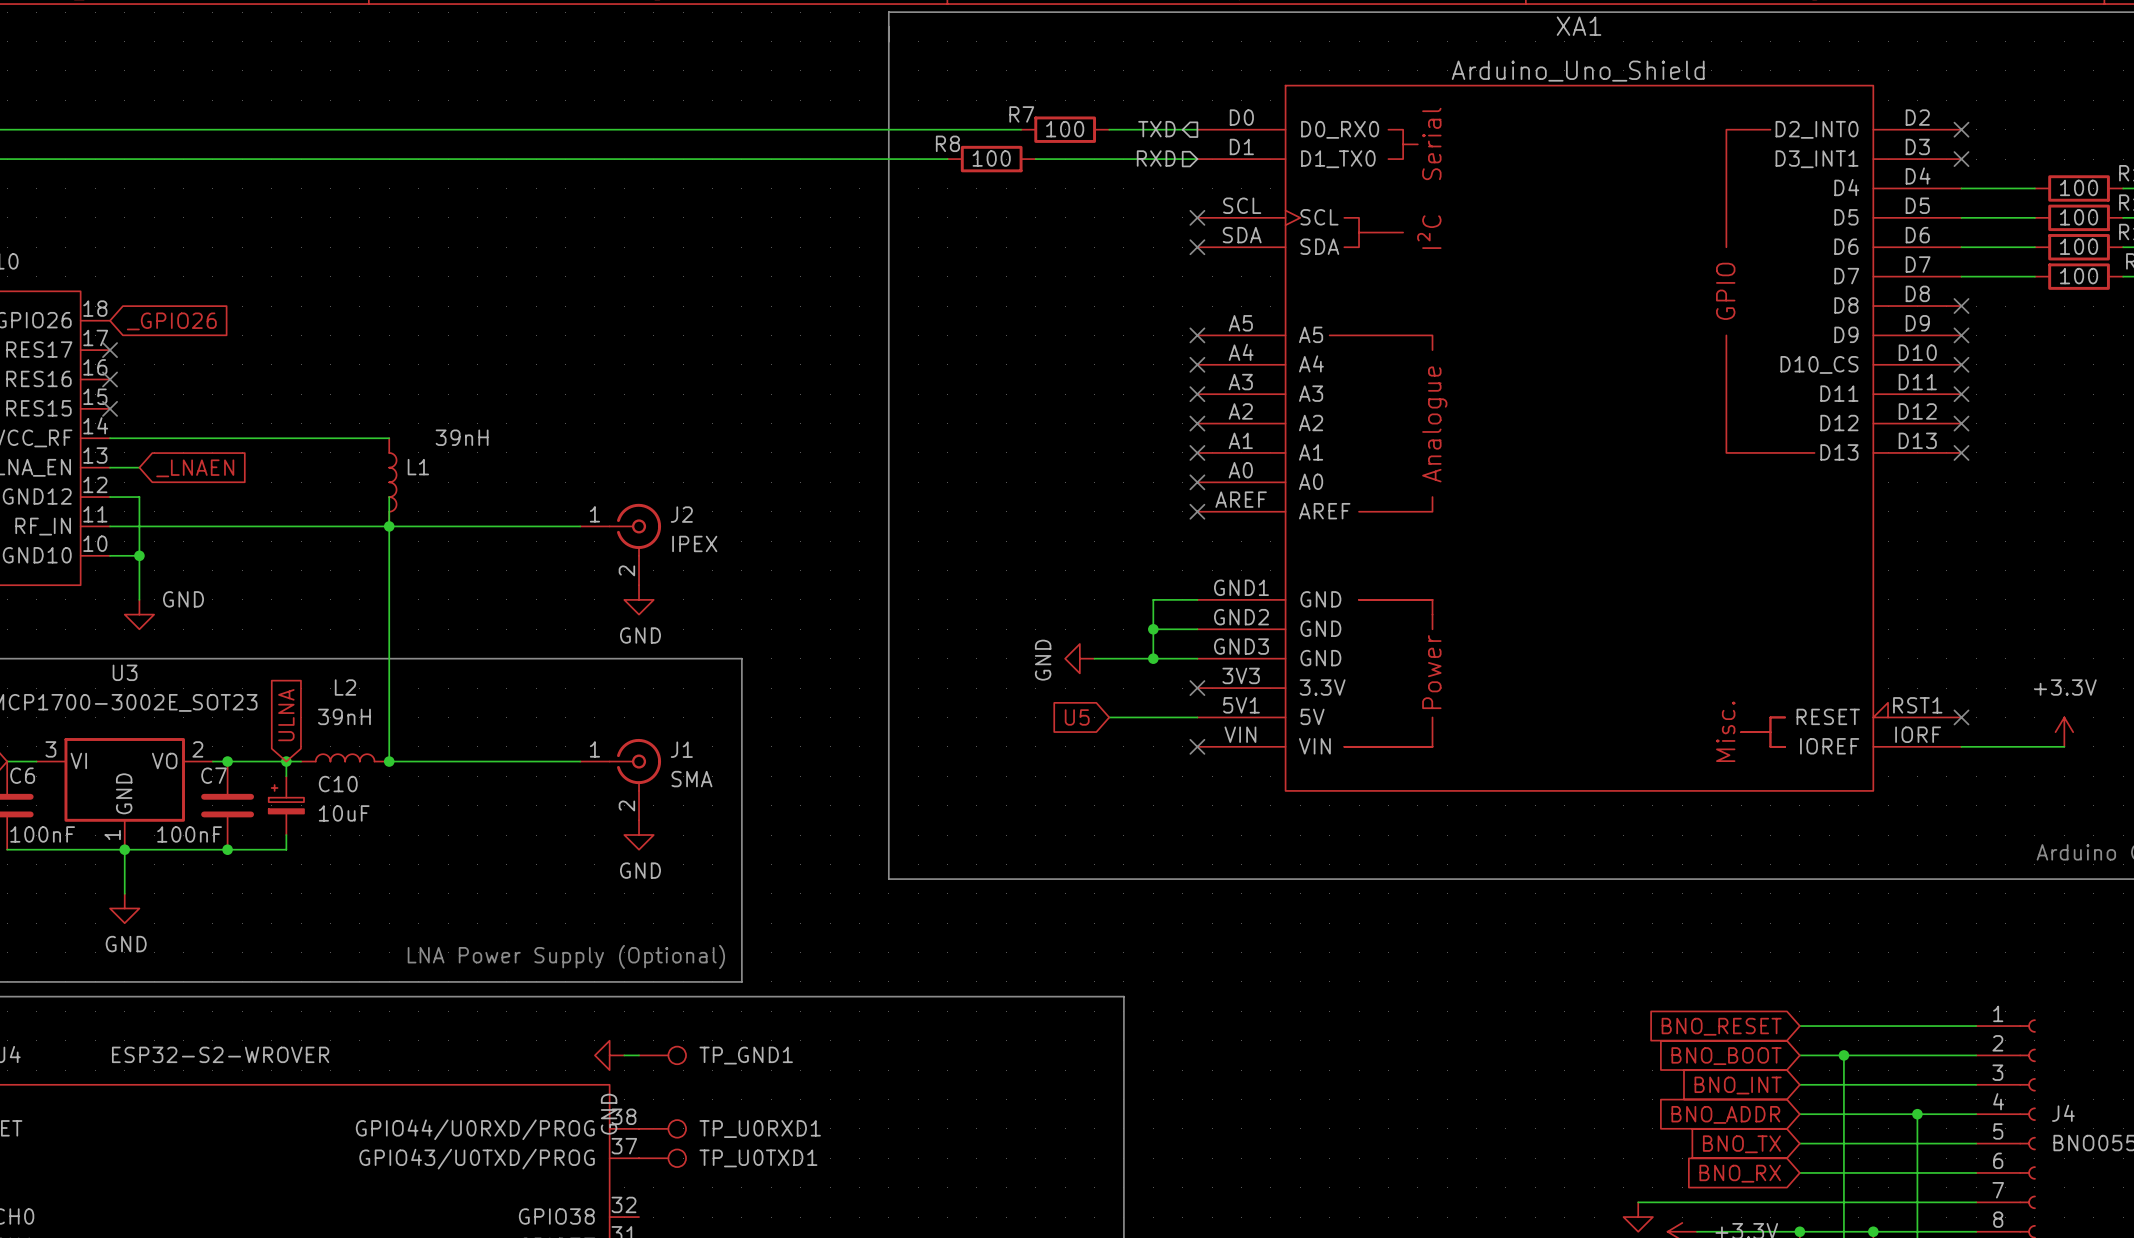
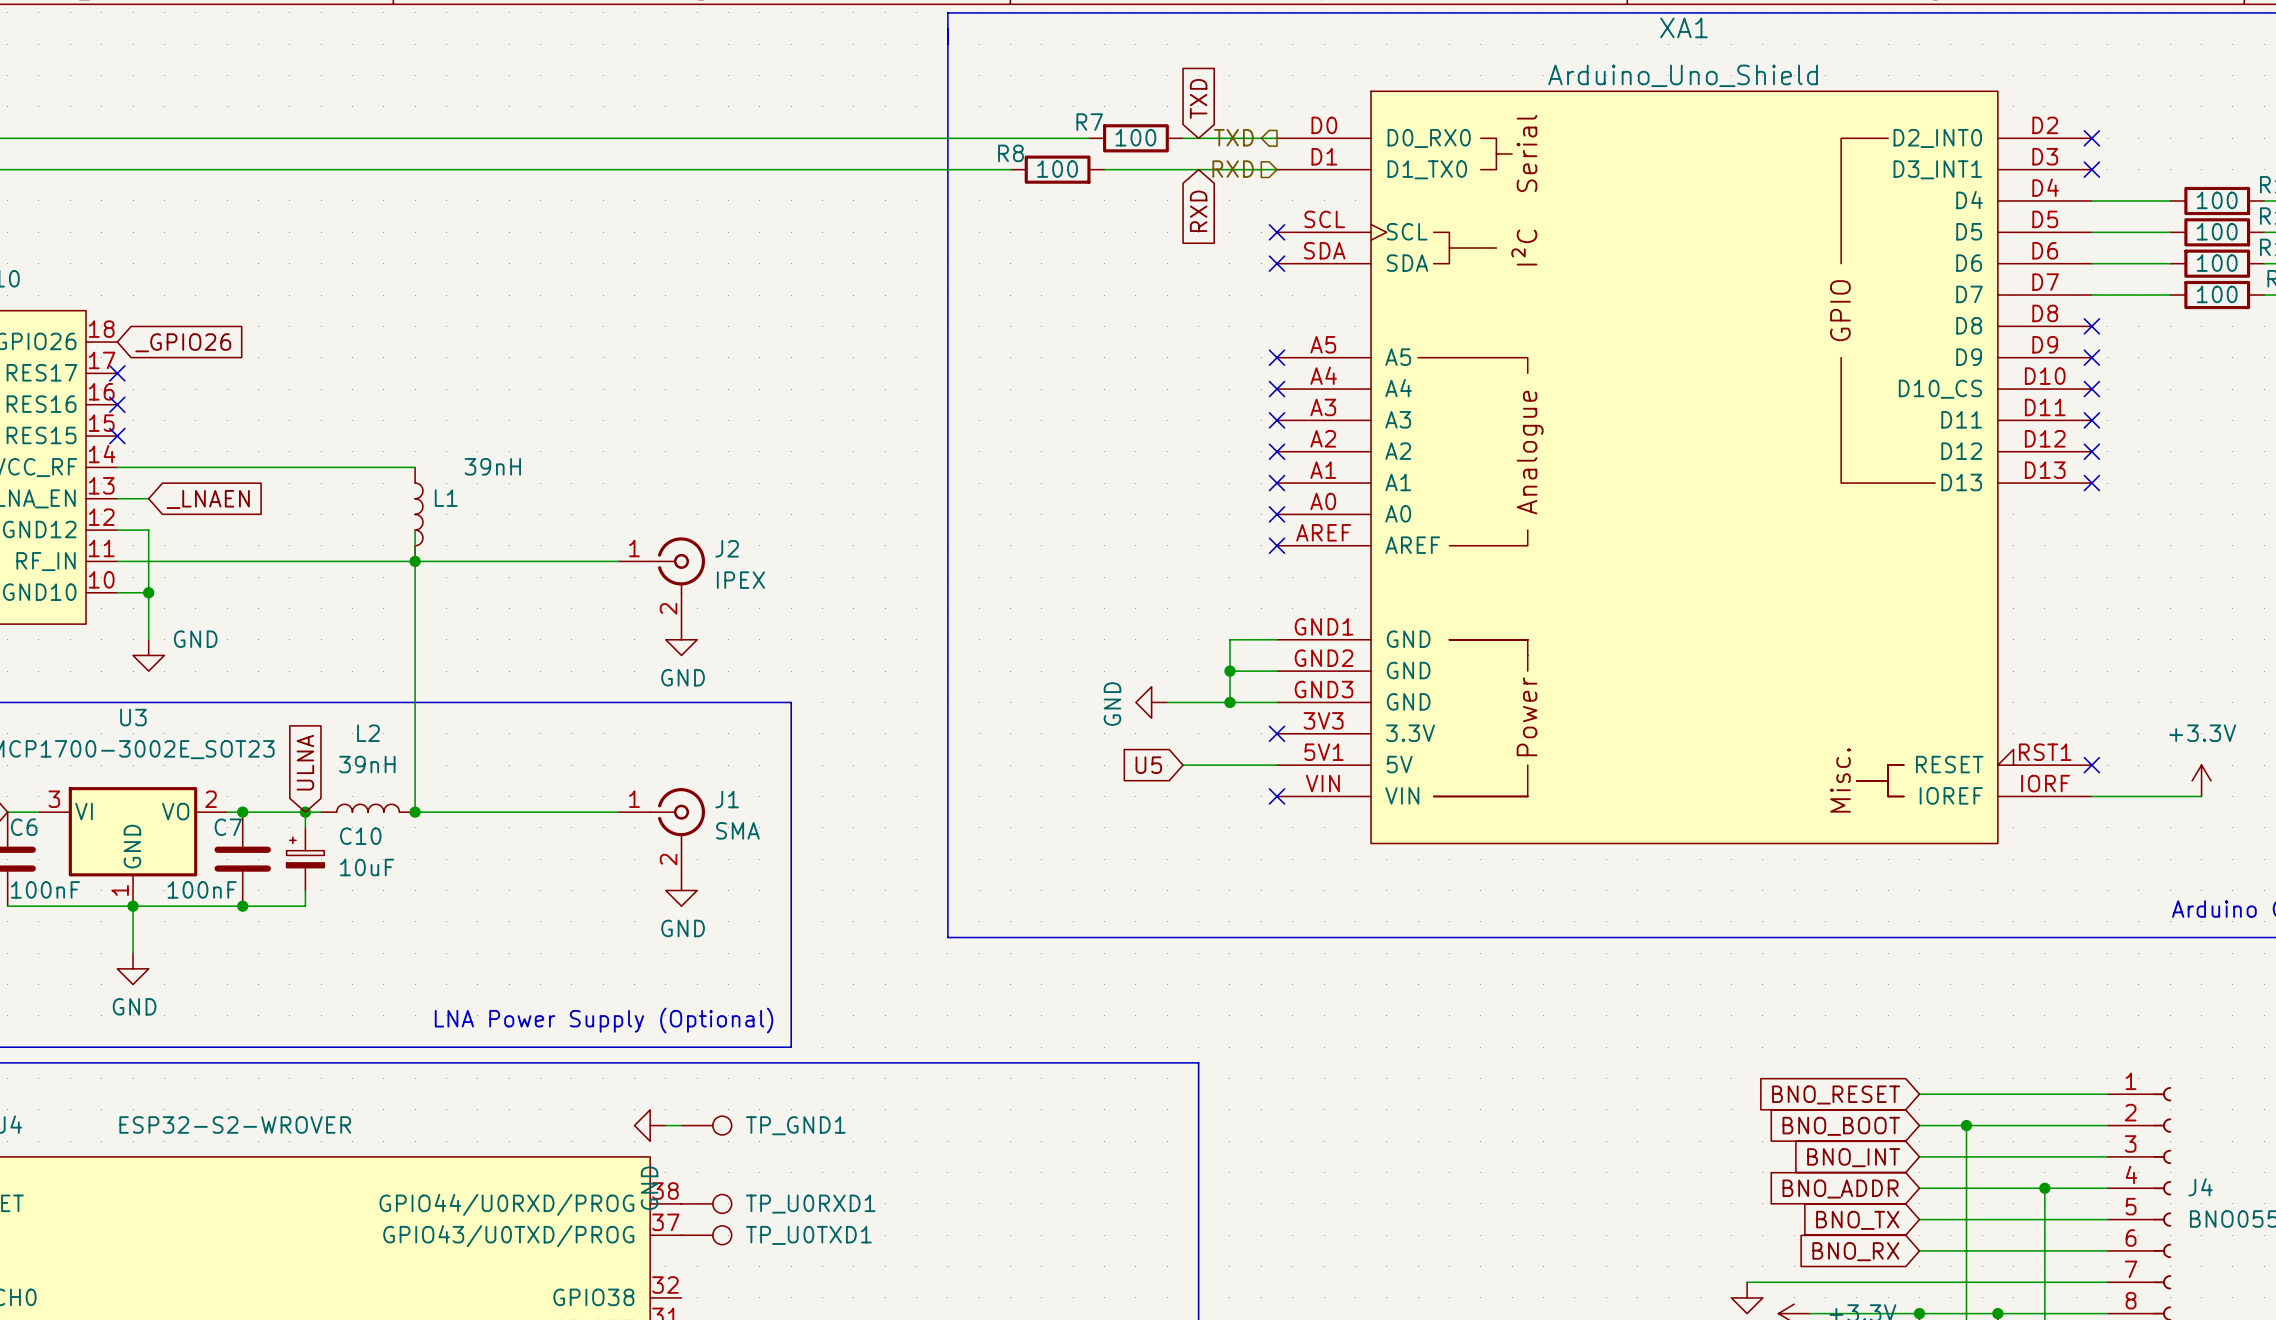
global label: none -> TXD (1198, 98)
global label: none -> RXD (1198, 211)

